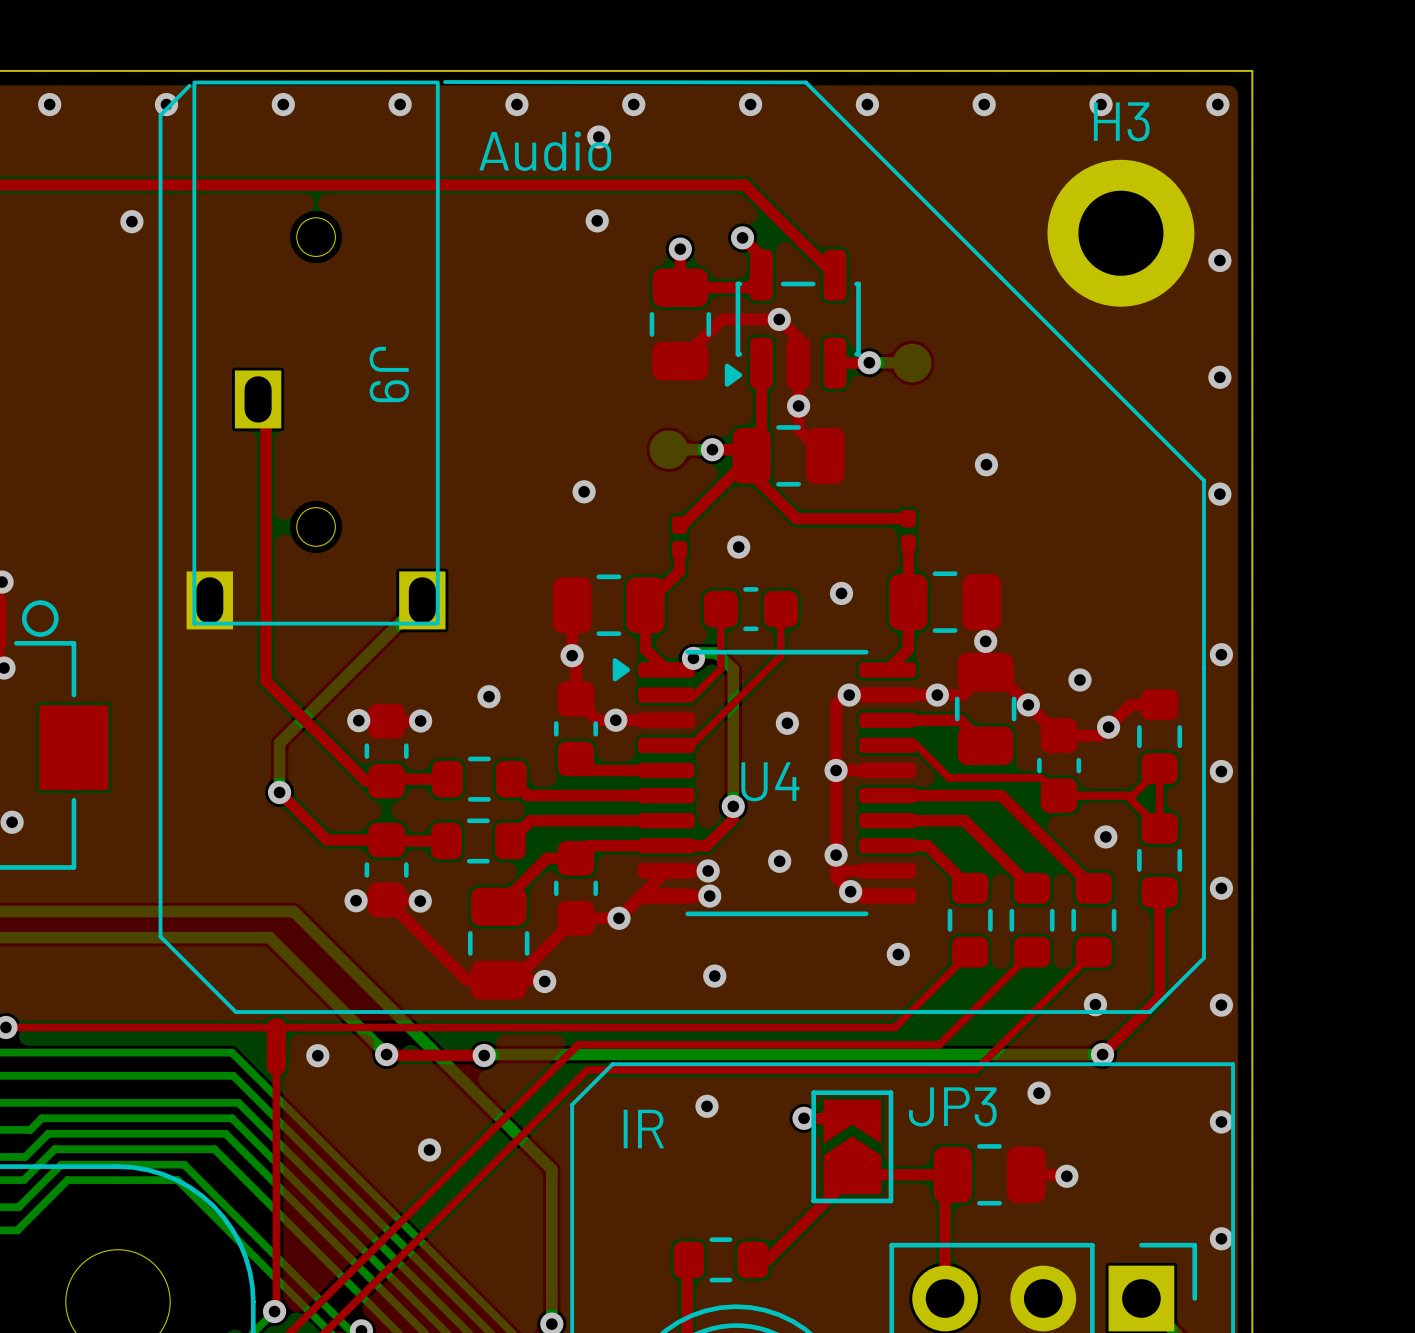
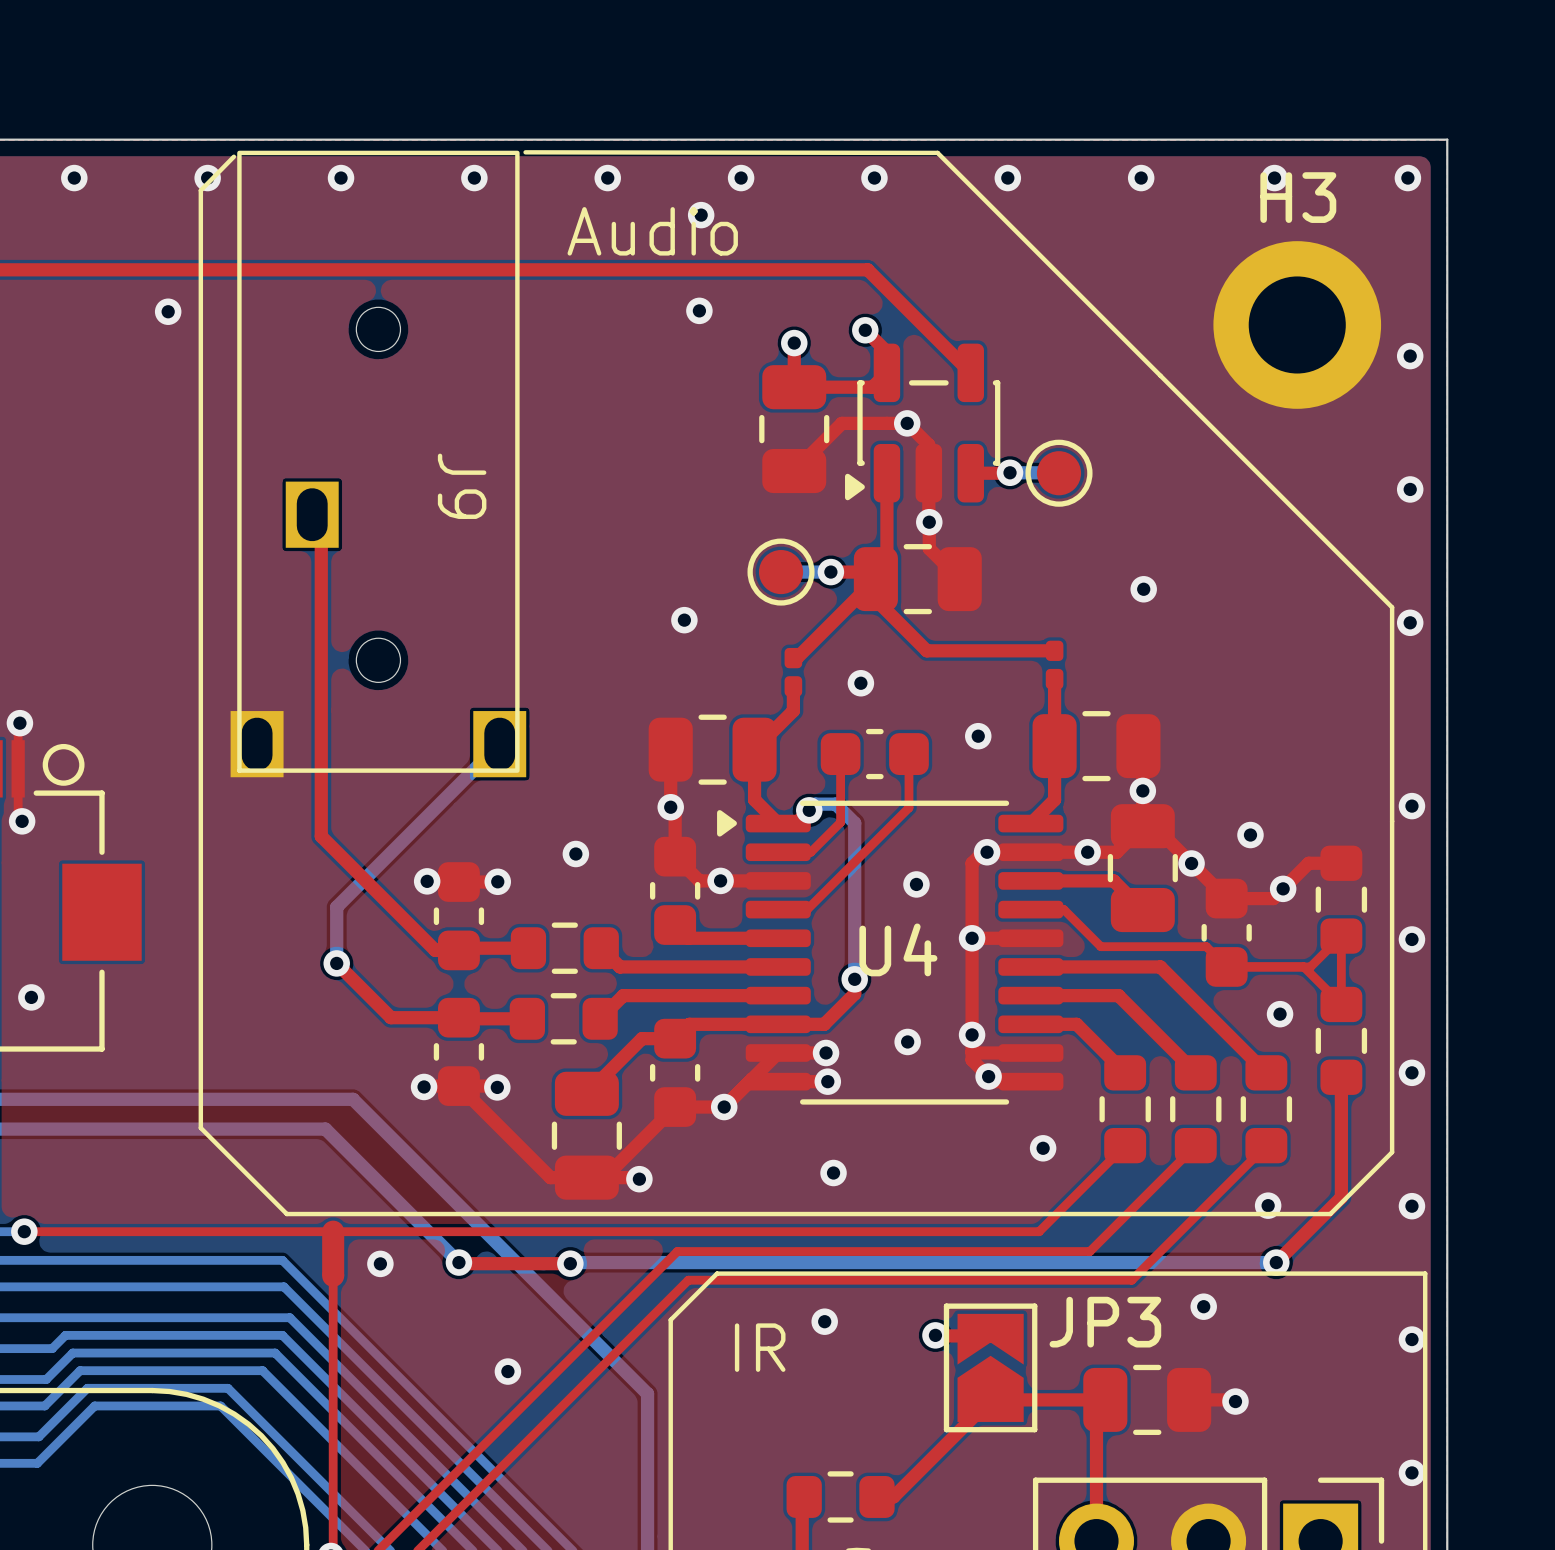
part side: bottom (912, 363) -> top (1058, 473)
part side: bottom (668, 449) -> top (781, 572)

